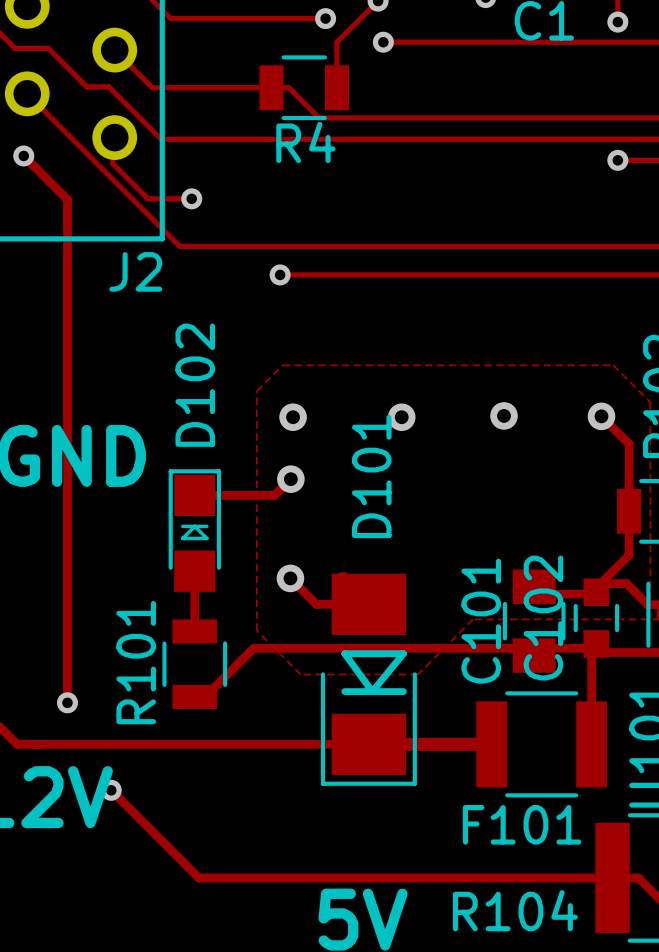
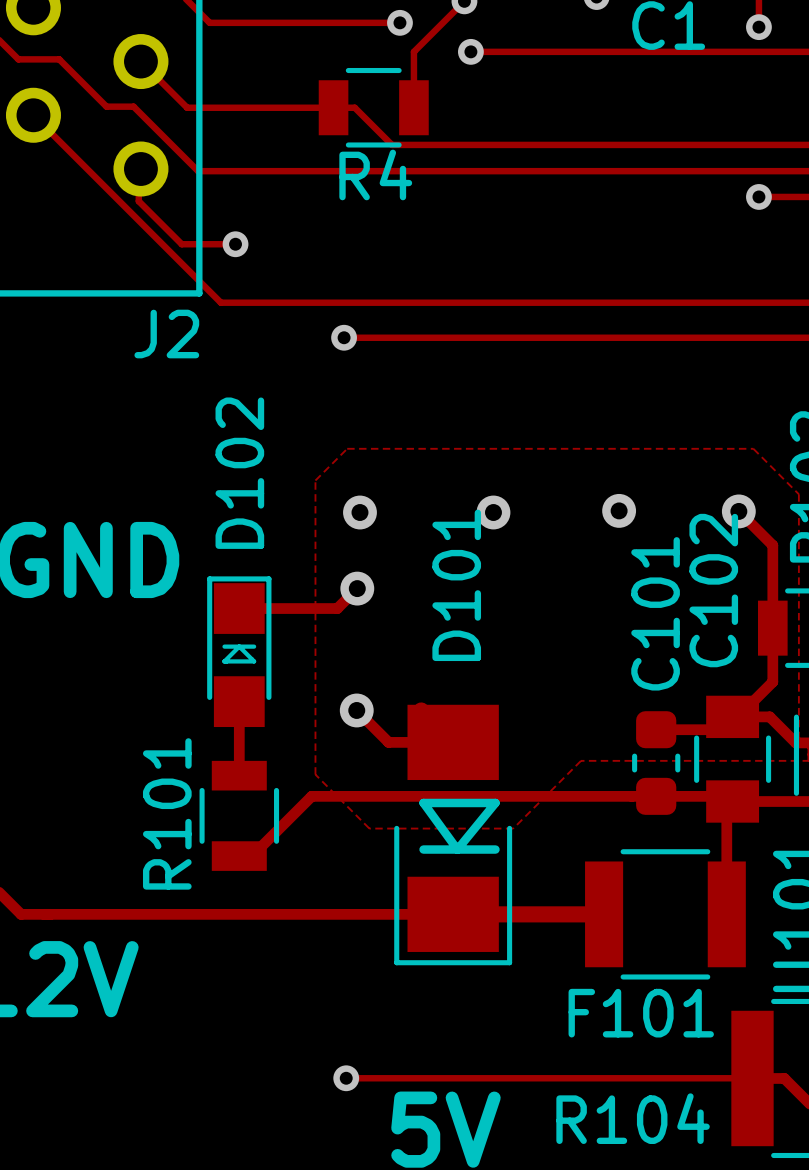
track: (23, 155) (67, 199) (67, 702) -> none
via: (23, 155) -> none
C101 footprint: [502, 569, 566, 673] -> [632, 711, 681, 815]
C102 footprint: [573, 578, 620, 658] -> [694, 695, 772, 823]
C102 name position: C102 (543, 618) -> C102 (713, 590)
C101 name position: C101 (481, 621) -> C101 (655, 613)
via: (67, 702) -> none
track: (111, 790) (198, 877) (612, 877) -> (346, 1078) (752, 1078)
via: (111, 790) -> none
via: none -> (346, 1078)

